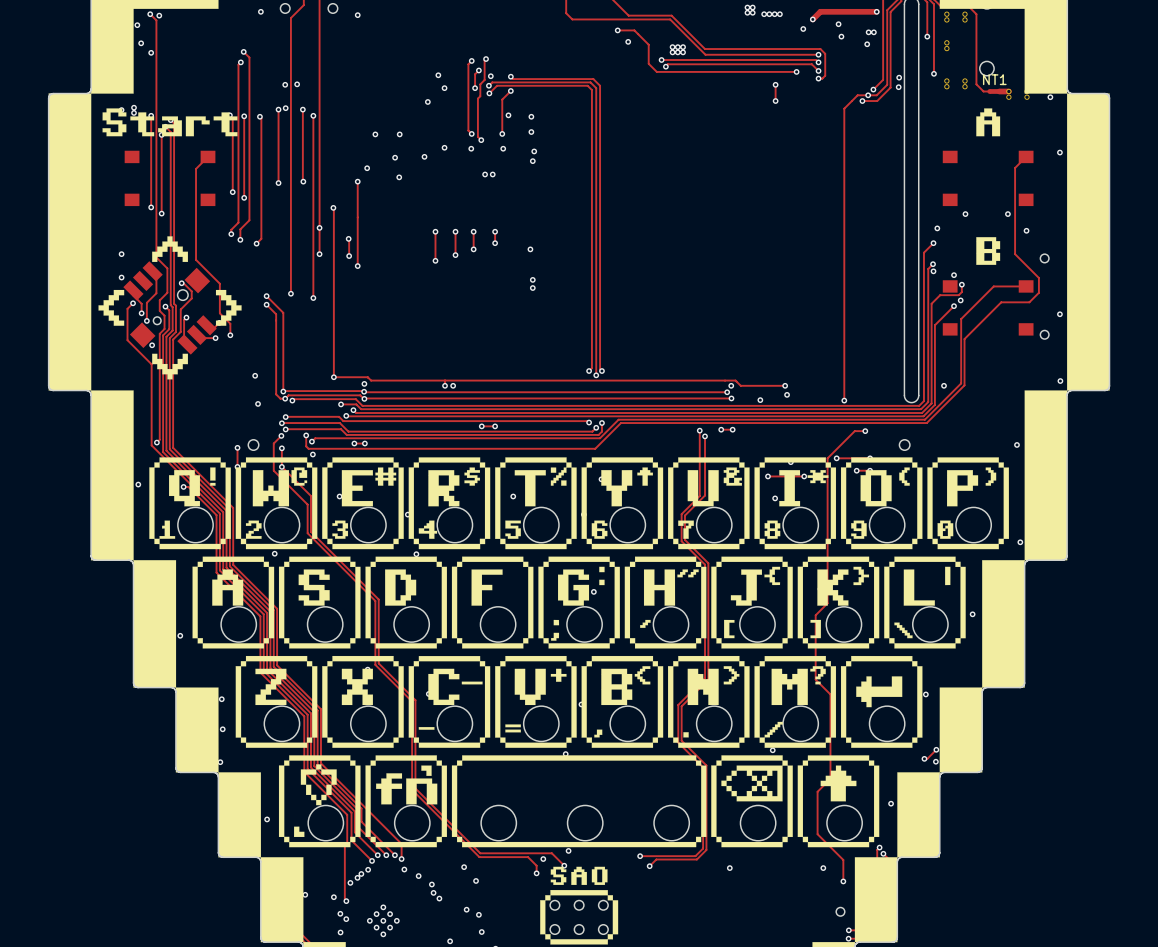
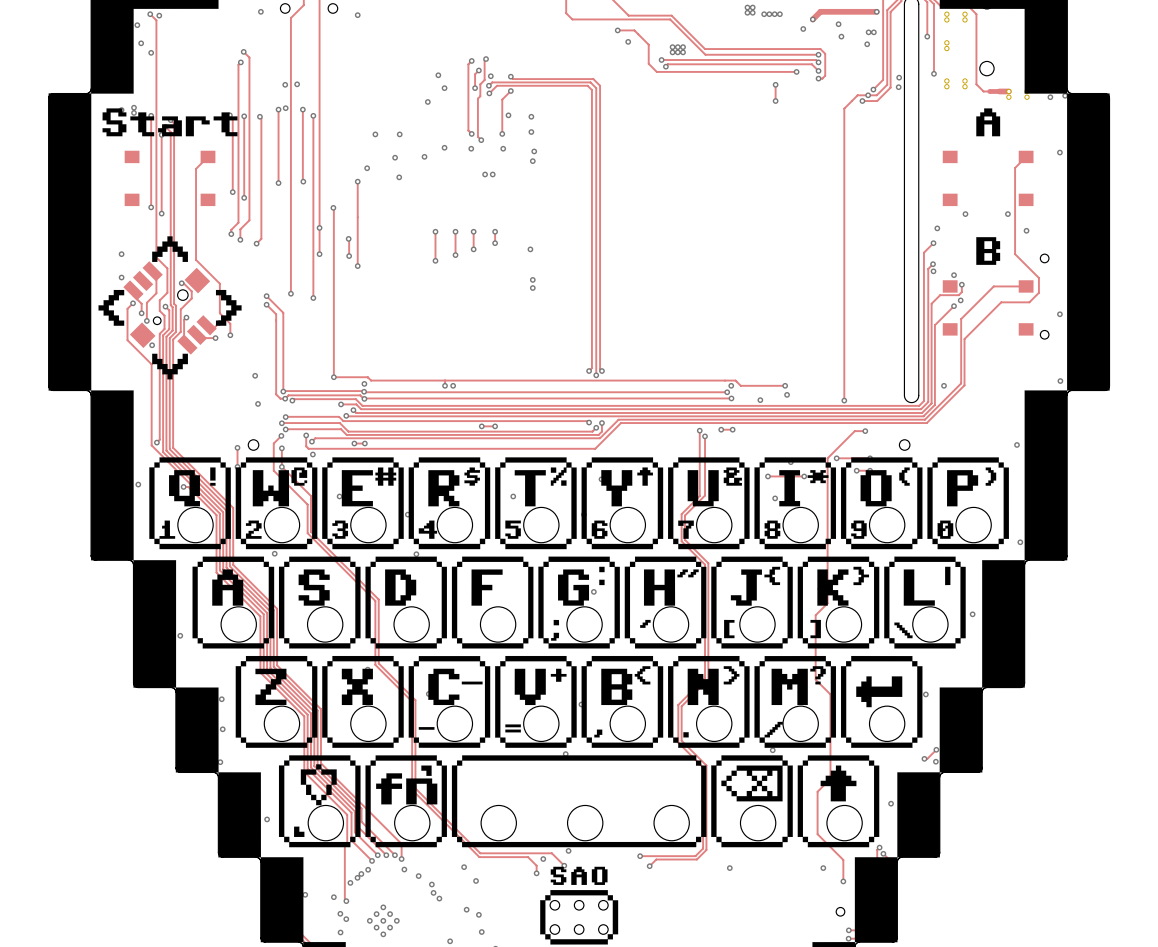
NT1 name: NT1 (994, 79) -> none
via: none -> (1065, 95)

